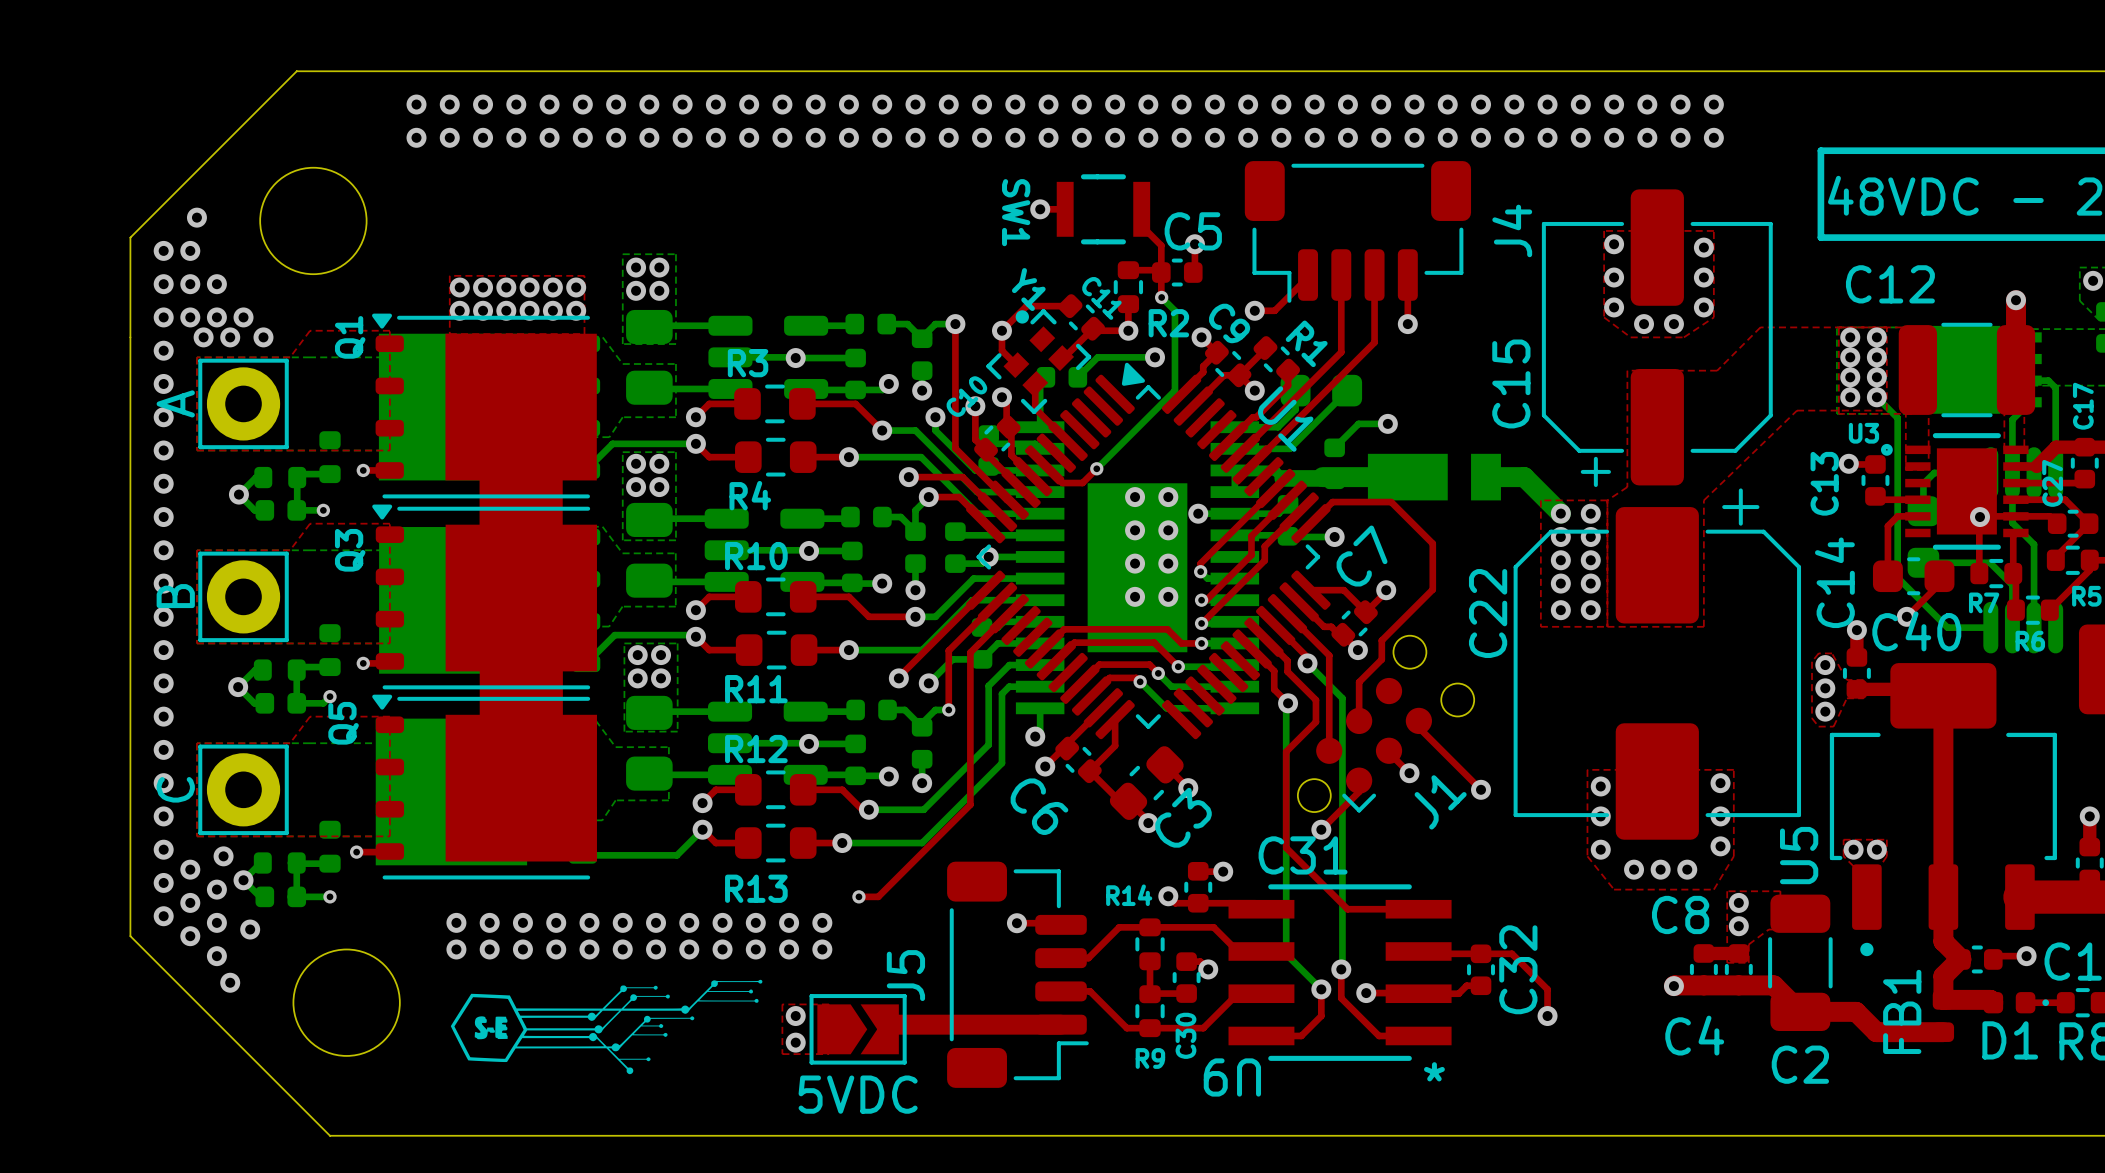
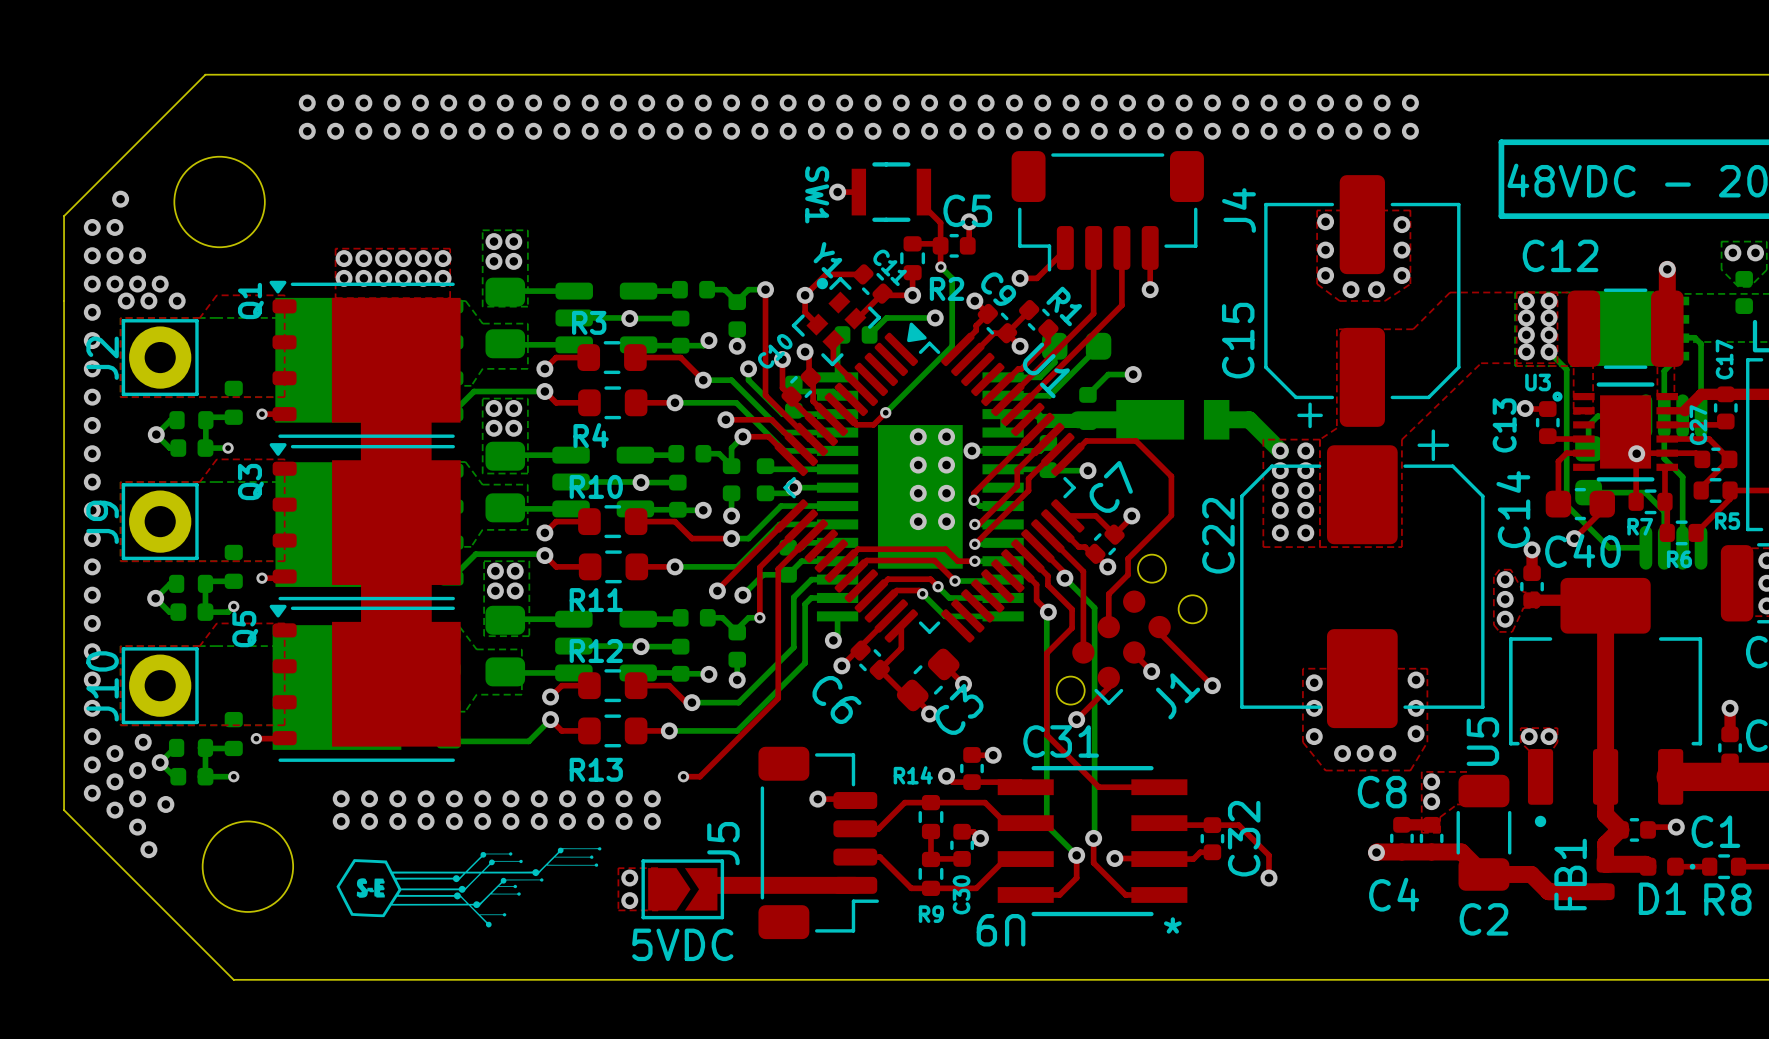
A name: A (175, 403) -> J2 (102, 358)
B name: B (175, 596) -> J9 (102, 522)
C name: C (175, 789) -> J10 (102, 686)

